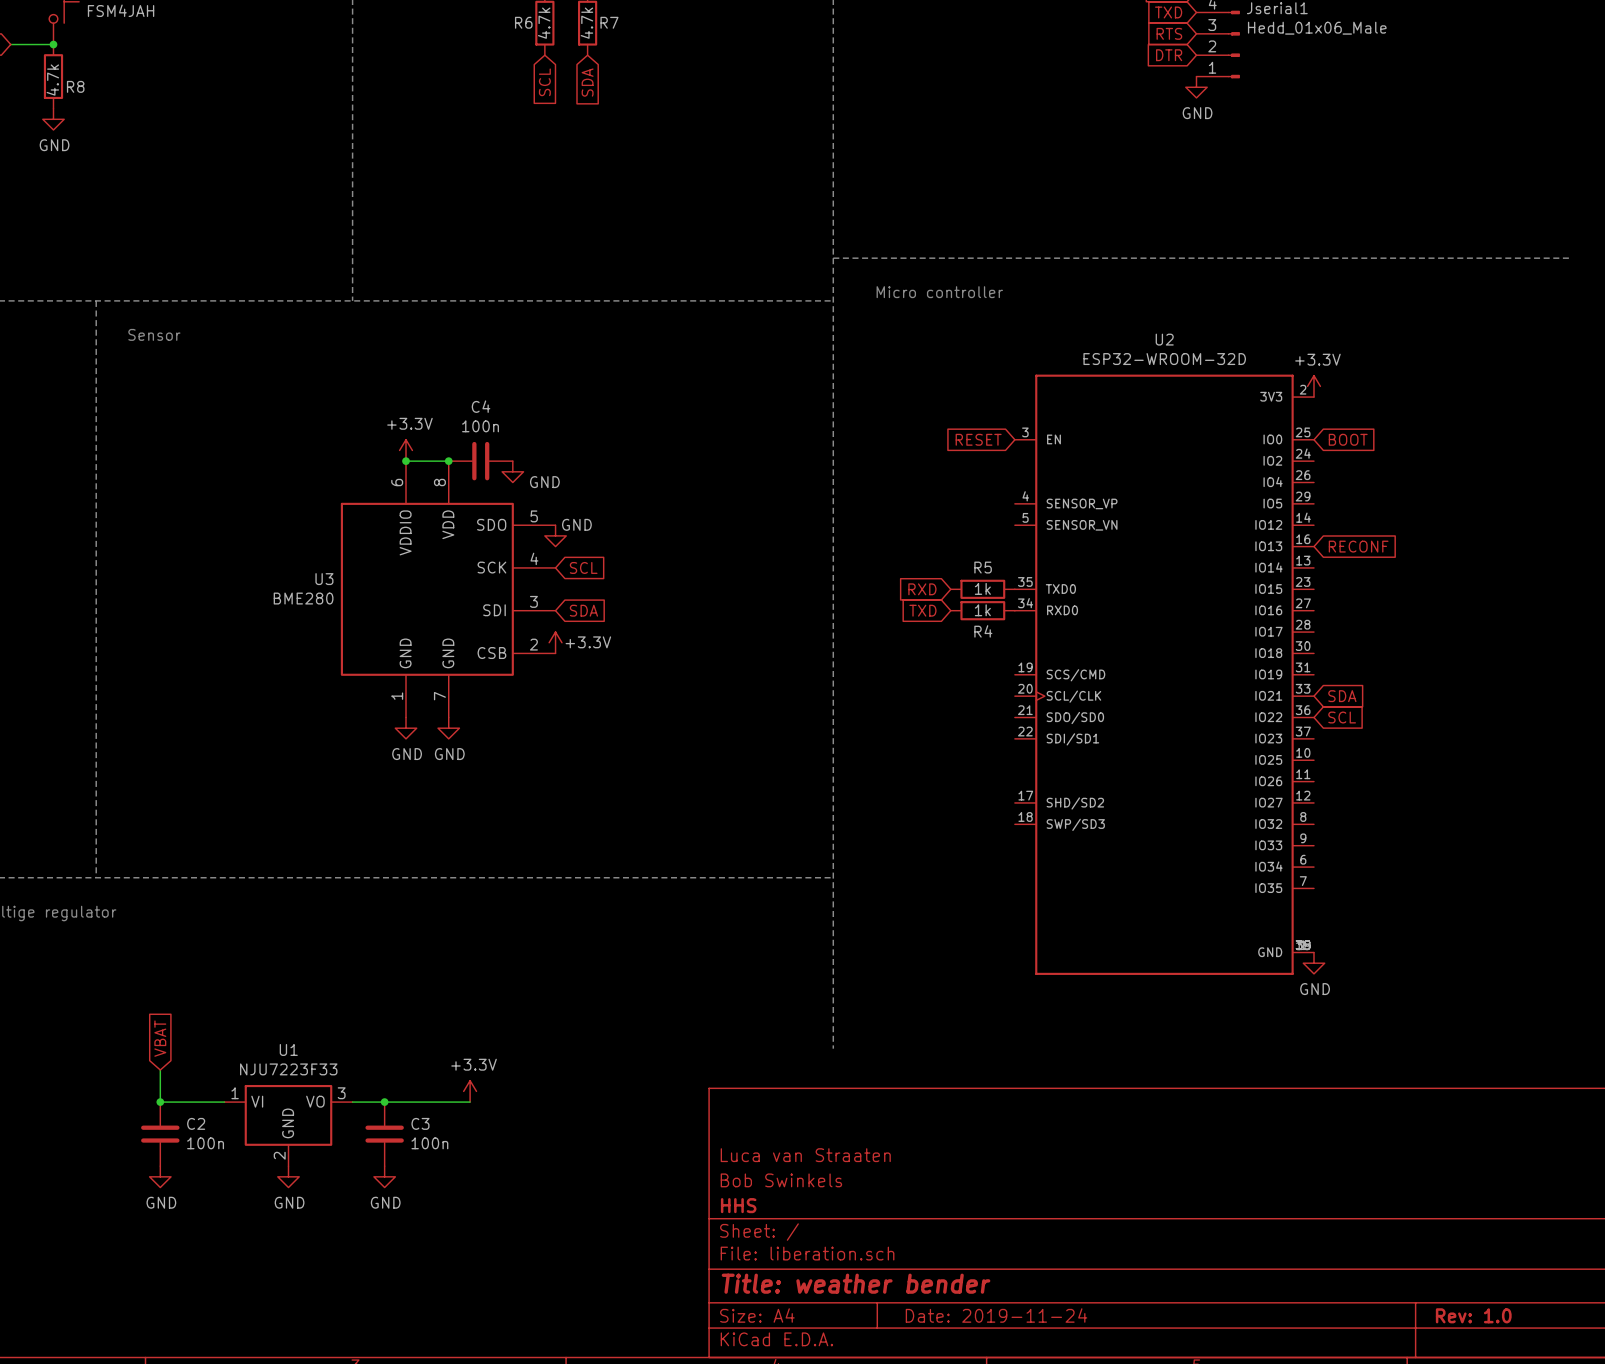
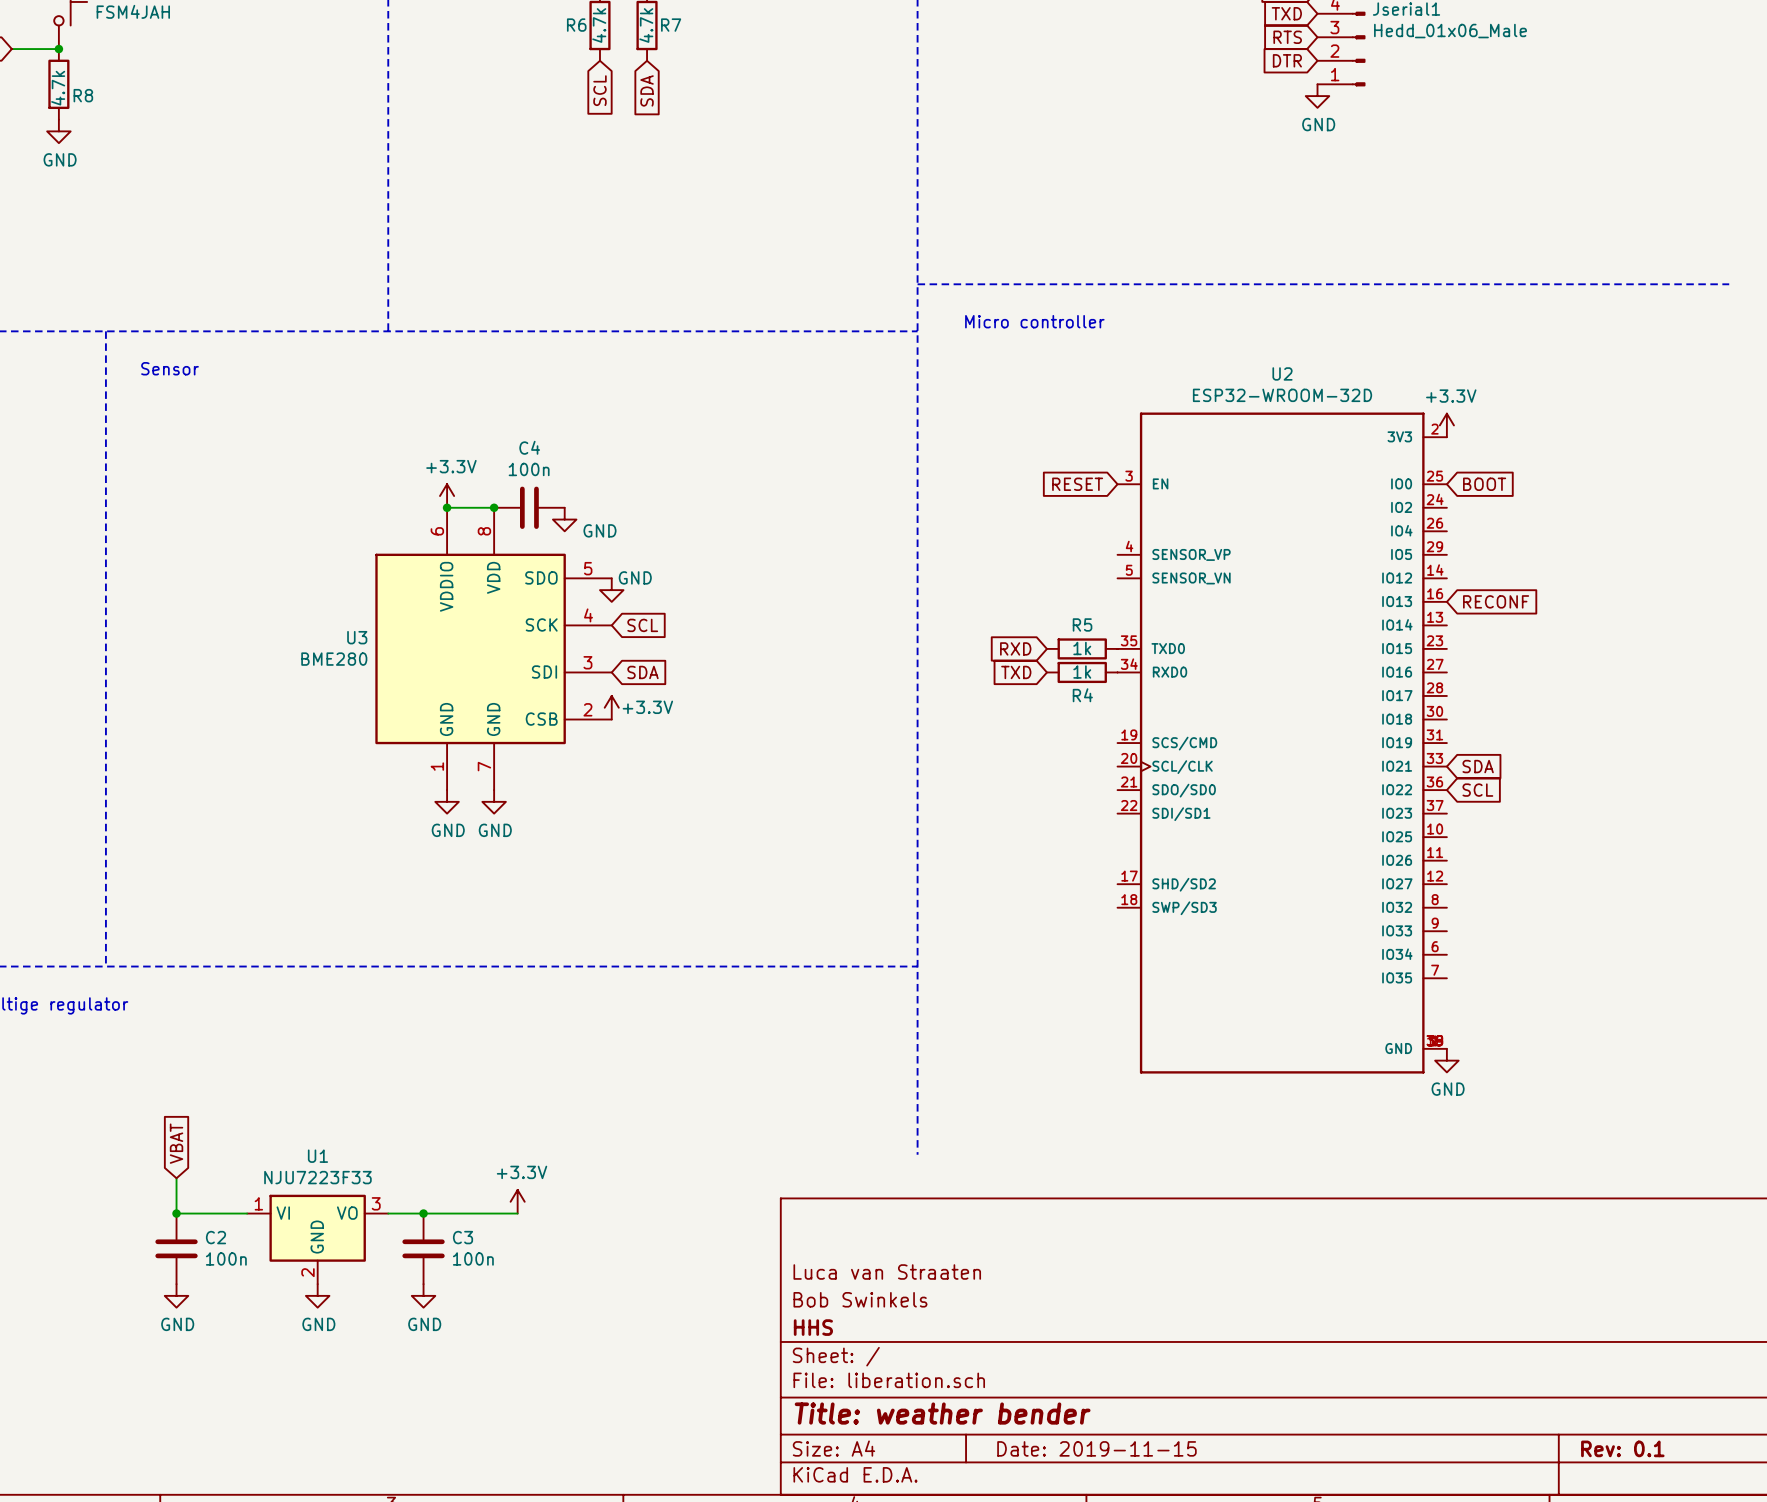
title block: Date: 2019-11-24 (996, 1315) -> Date: 2019-11-15 (1096, 1448)
title block: Rev: 1.0 (1473, 1315) -> Rev: 0.1 (1622, 1448)

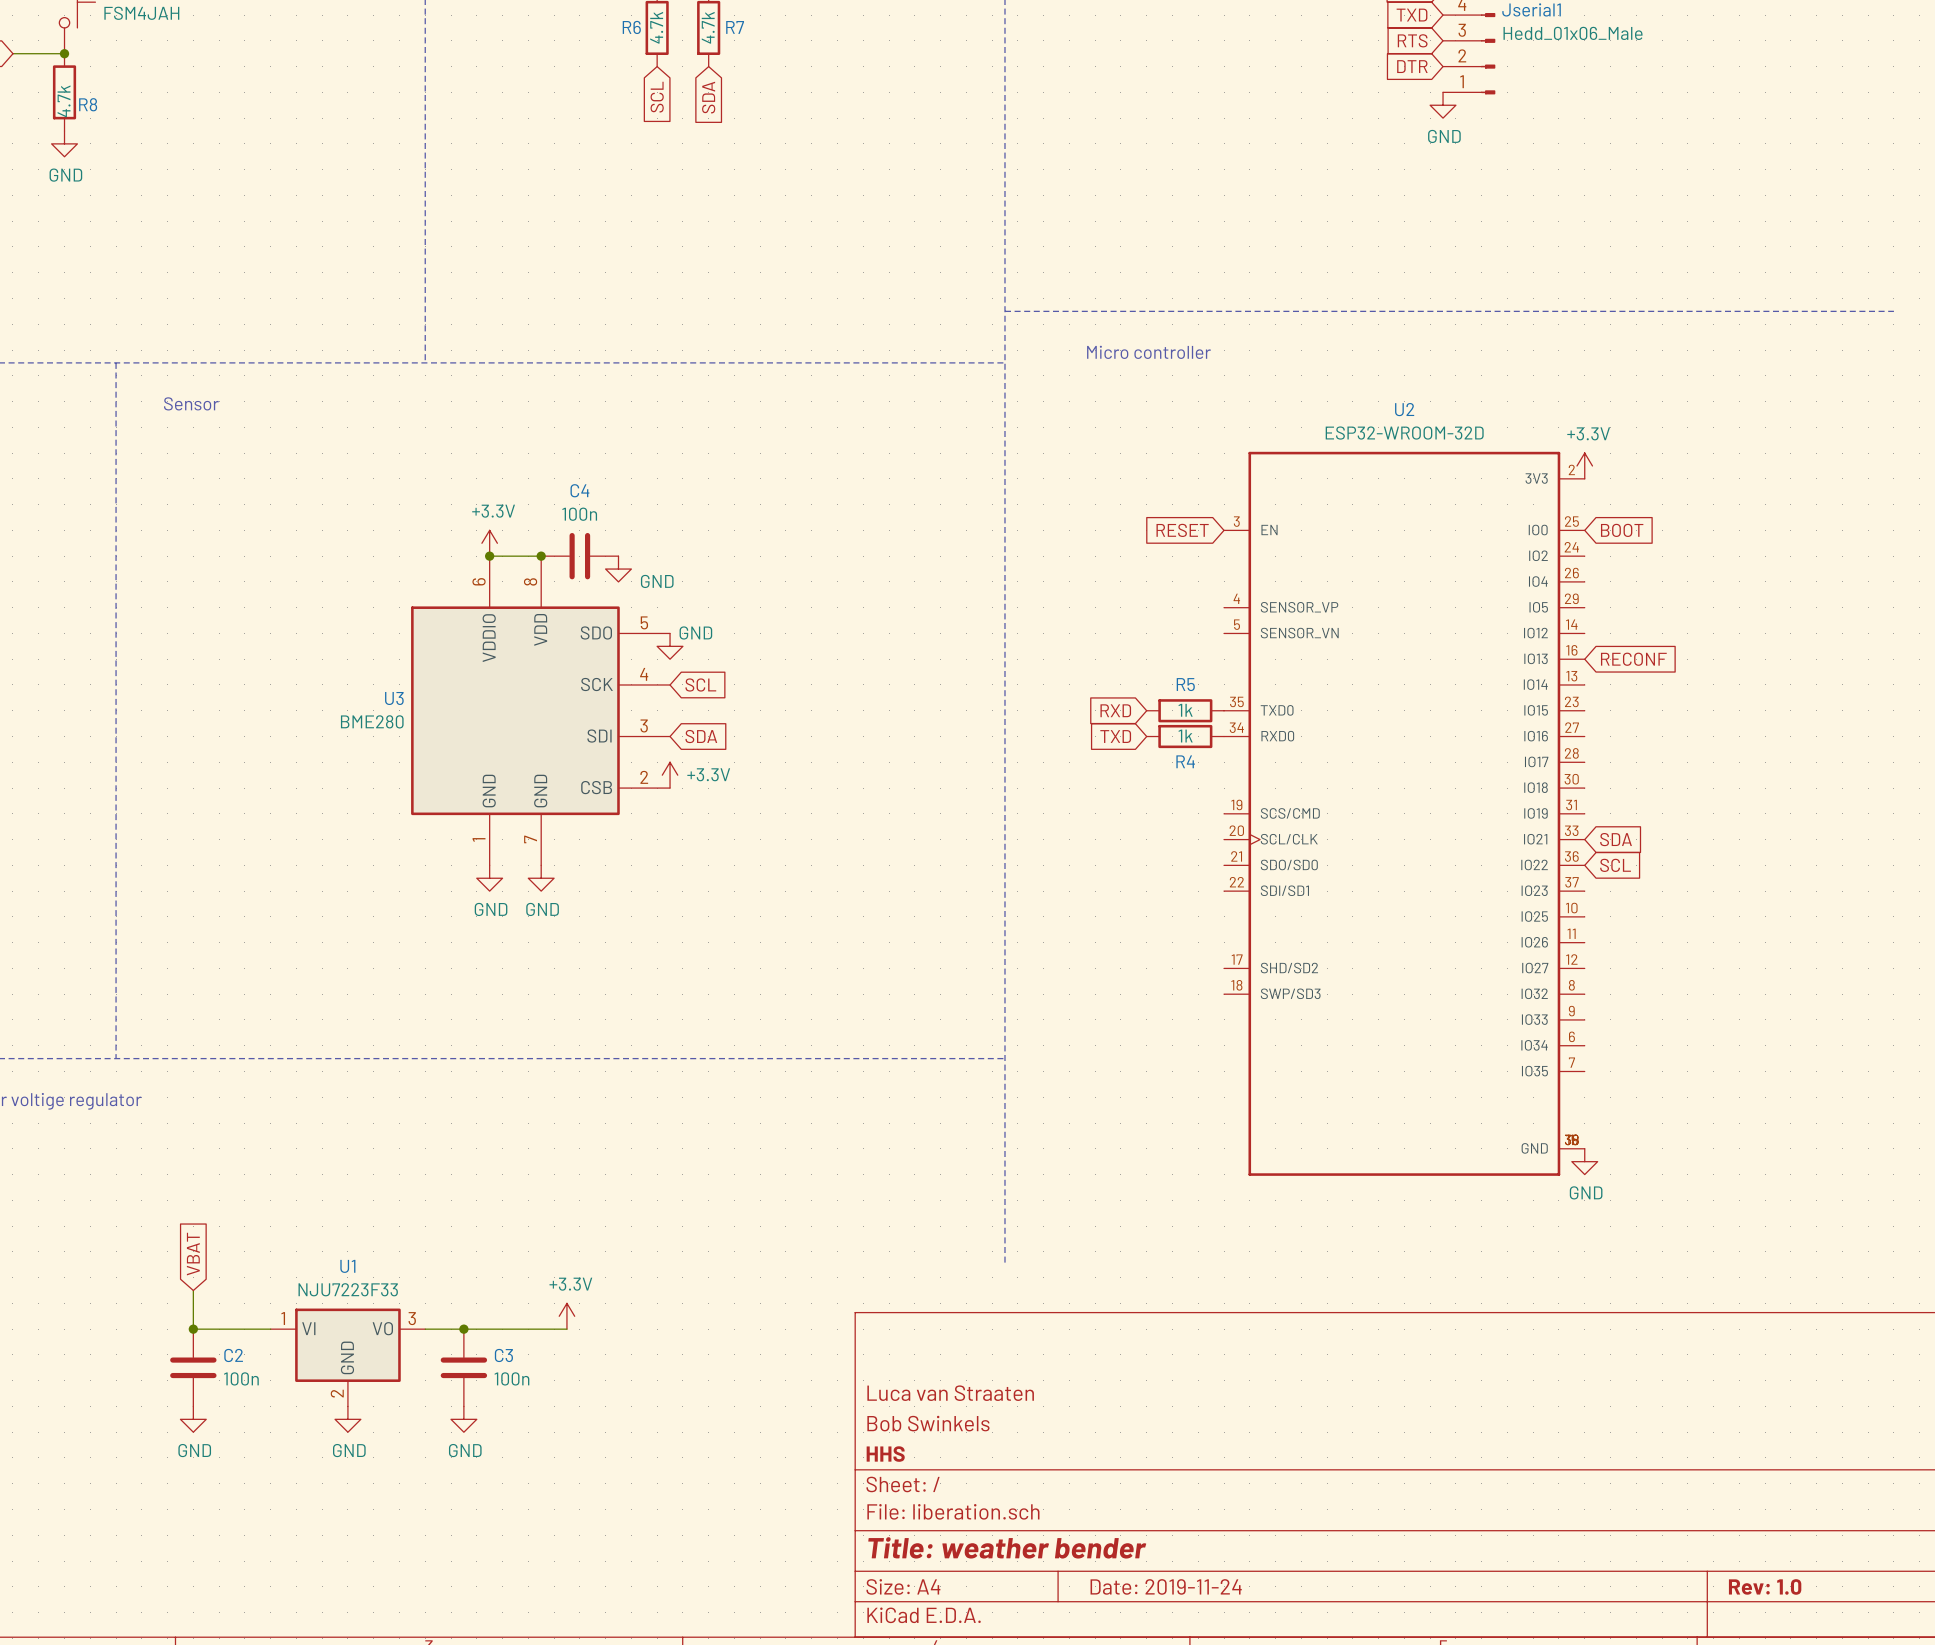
title block: Date: 2019-11-15 (1096, 1448) -> Date: 2019-11-24 (1166, 1586)
title block: Rev: 0.1 (1622, 1448) -> Rev: 1.0 (1765, 1586)

